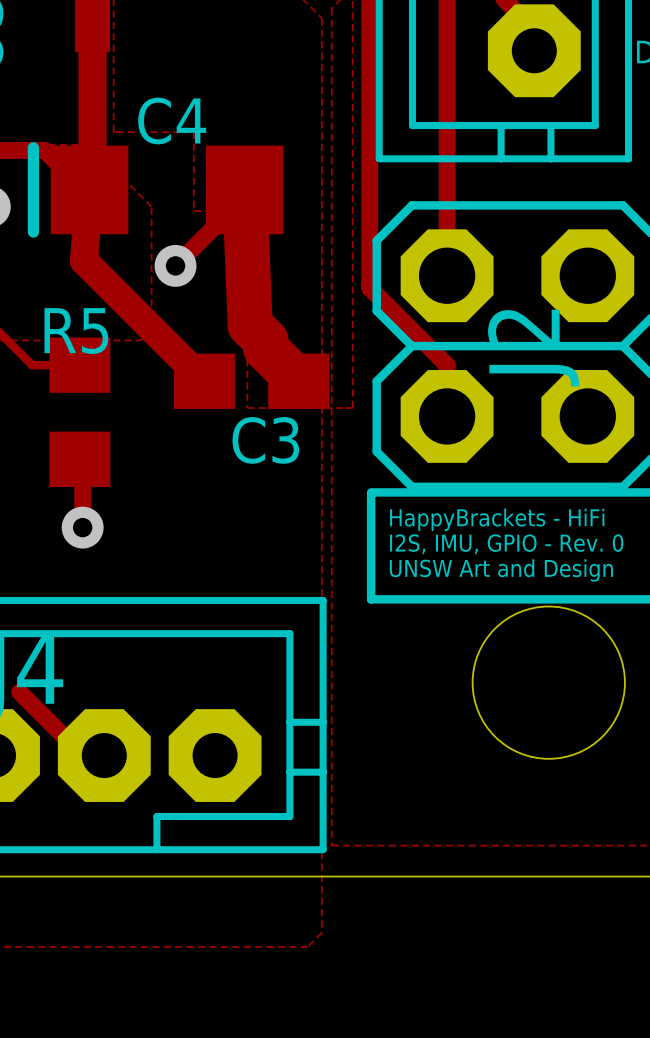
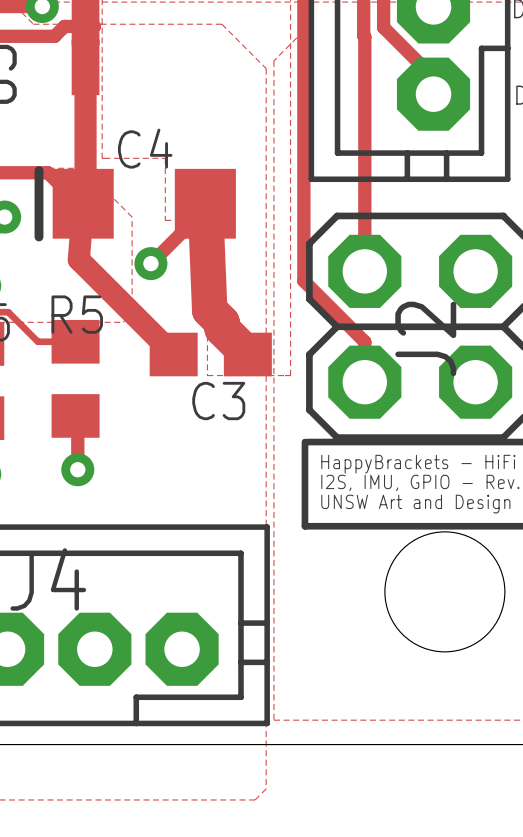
track: (19, 692) (83, 755) (104, 755) -> none

